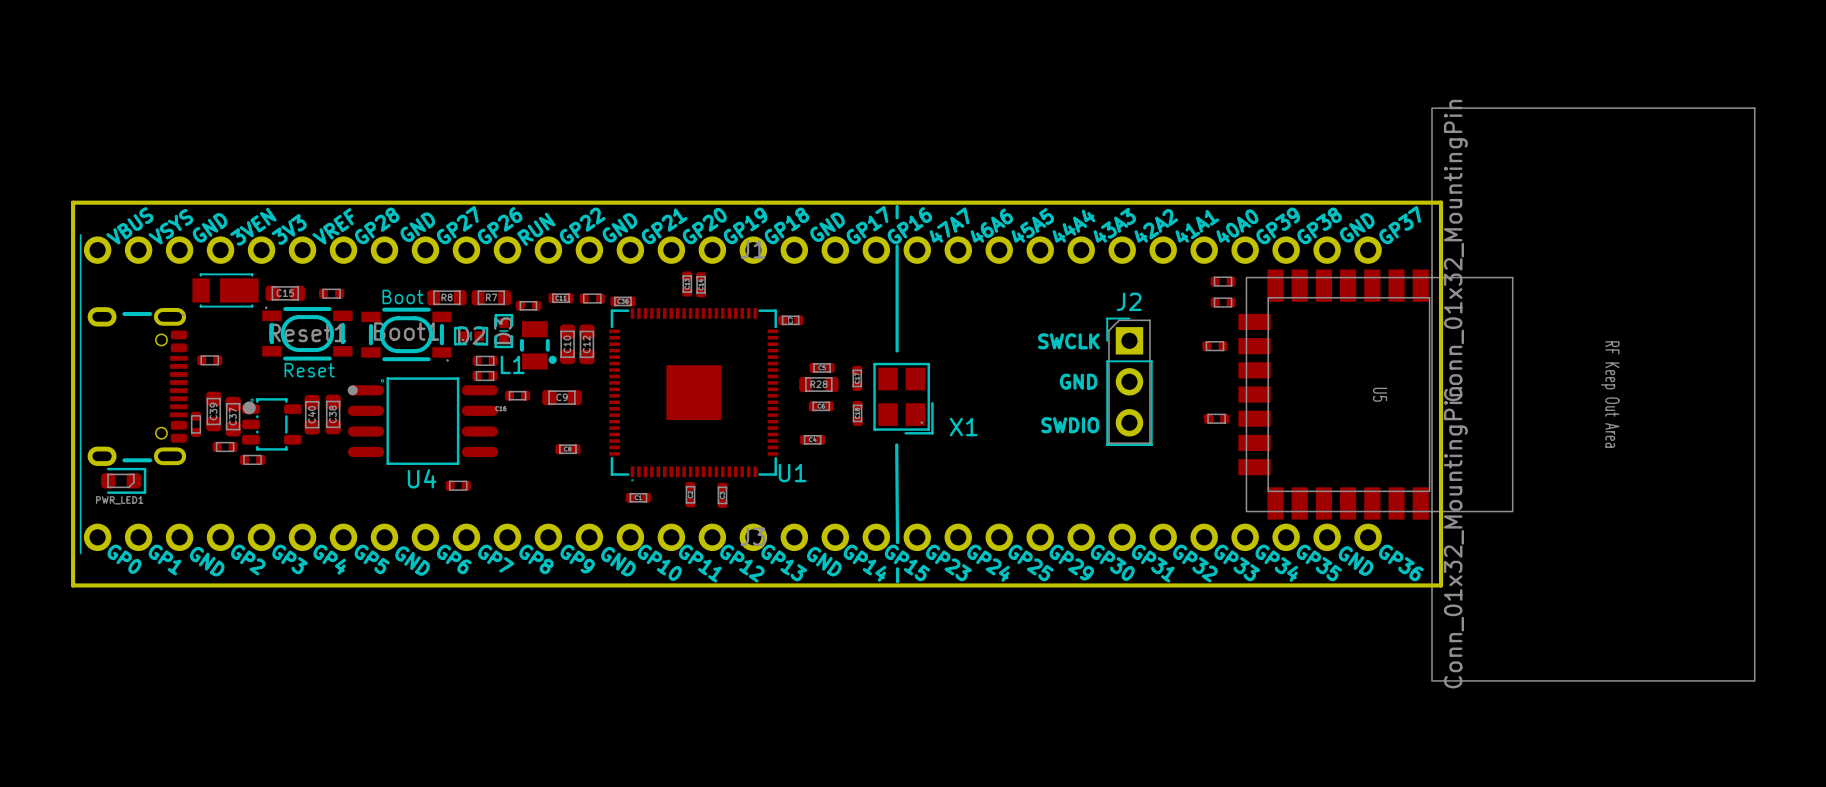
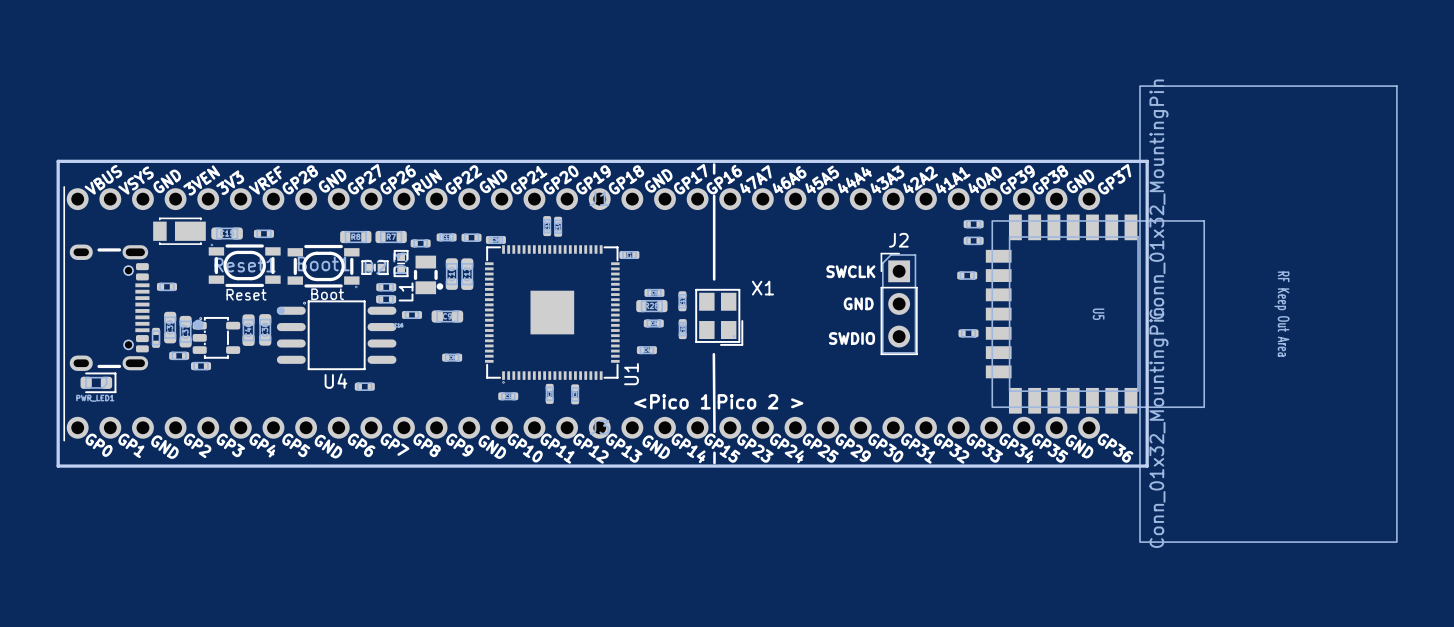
text position: Boot (402, 296) -> Boot (327, 294)
L1 name rotation: 0° (512, 364) -> 90° counterclockwise (406, 291)
X1 name position: X1 (963, 427) -> X1 (762, 288)
U1 name rotation: 0° (792, 473) -> 90° counterclockwise (631, 374)
text: none -> <Pico 1 (672, 401)
text: none -> Pico 2 > (760, 401)

